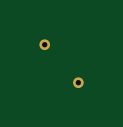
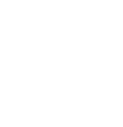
via: (44, 44) -> none
via: (78, 82) -> none

